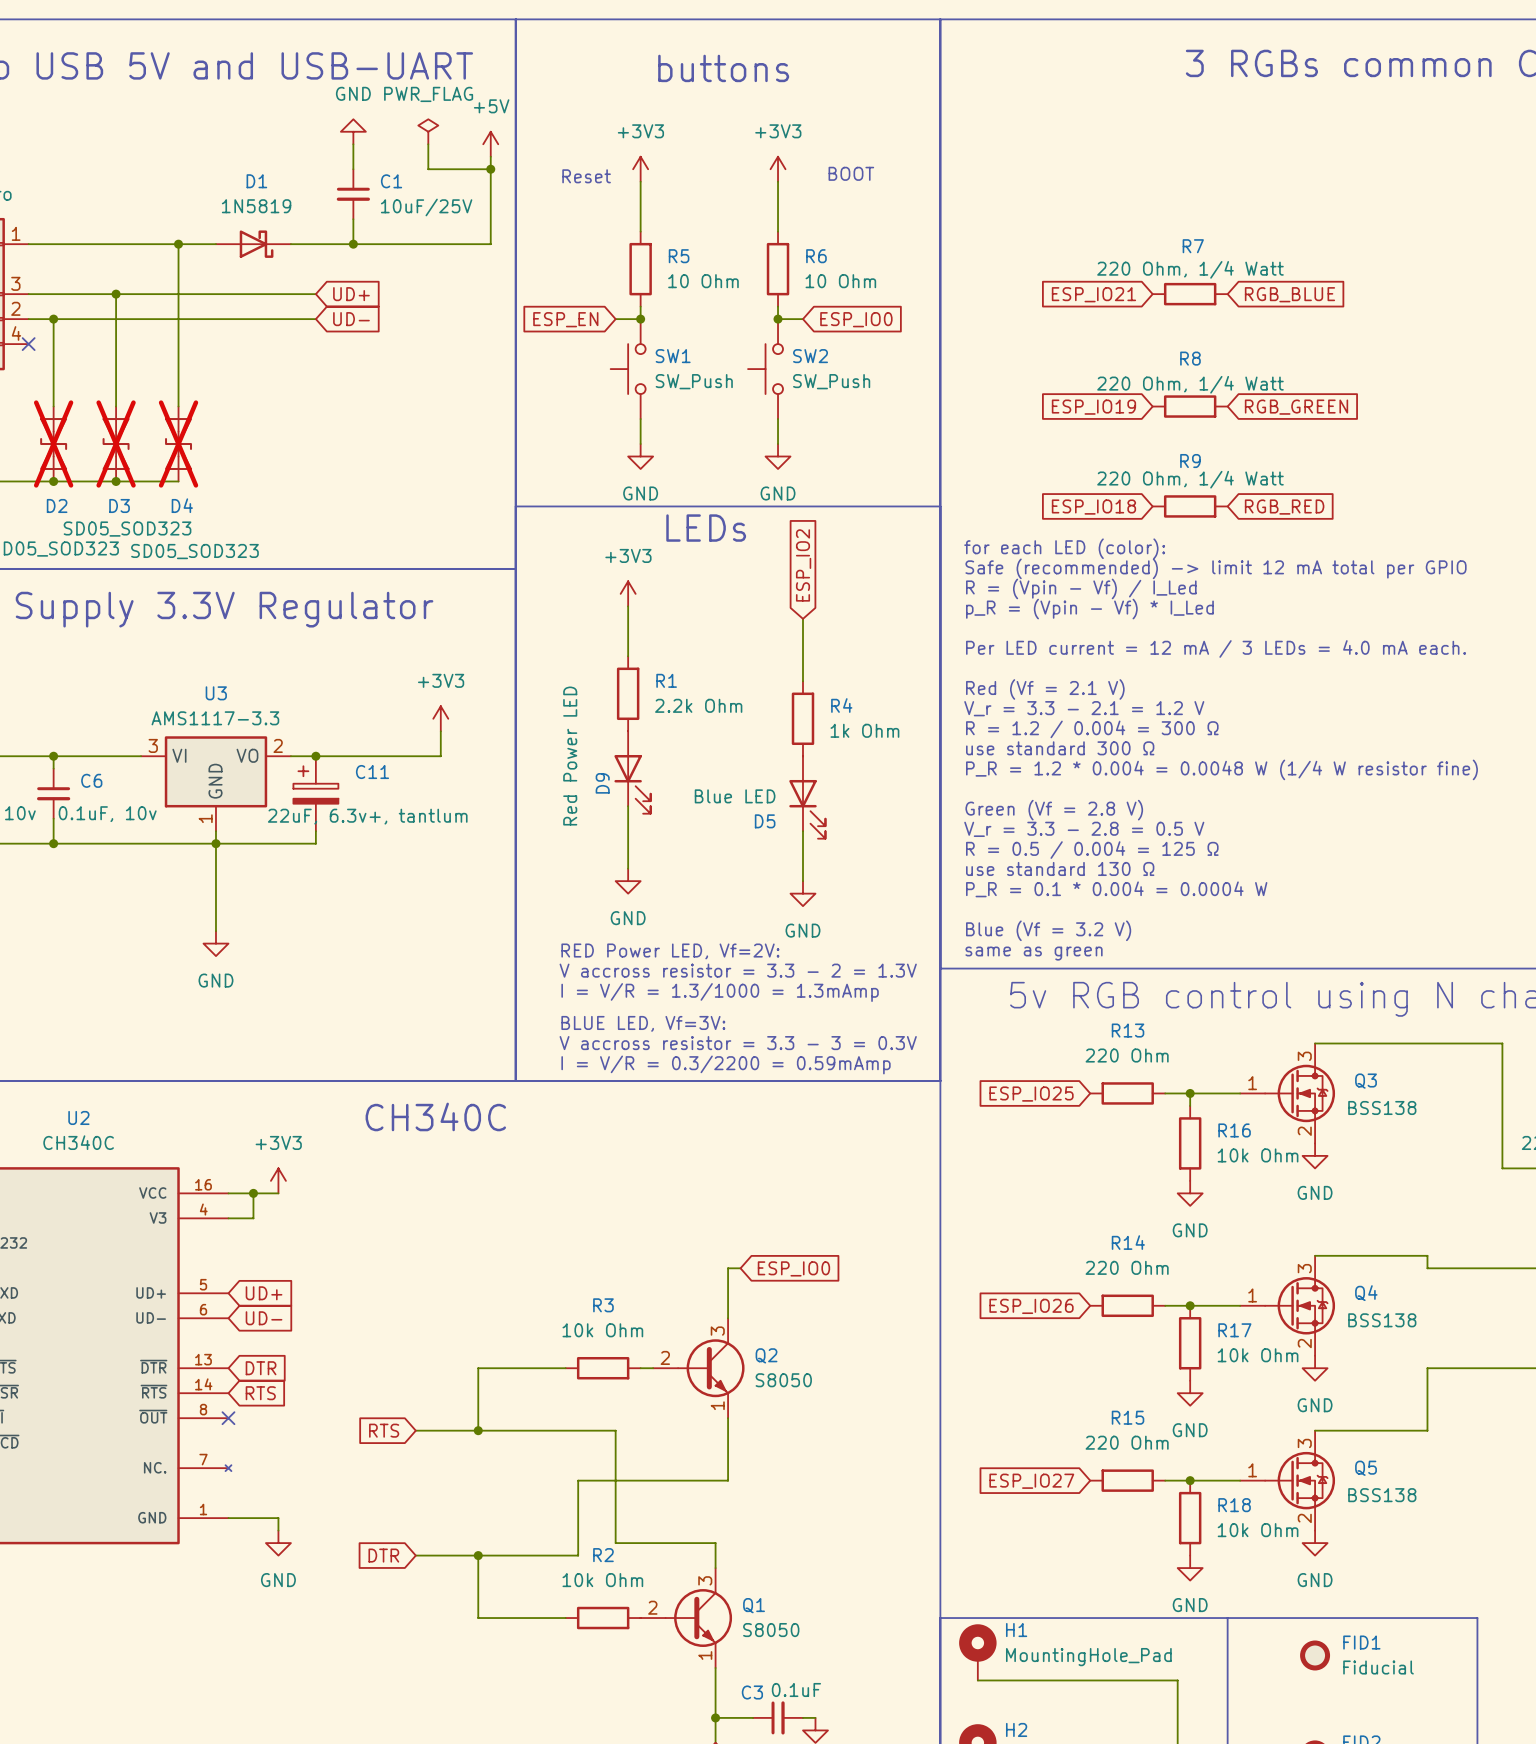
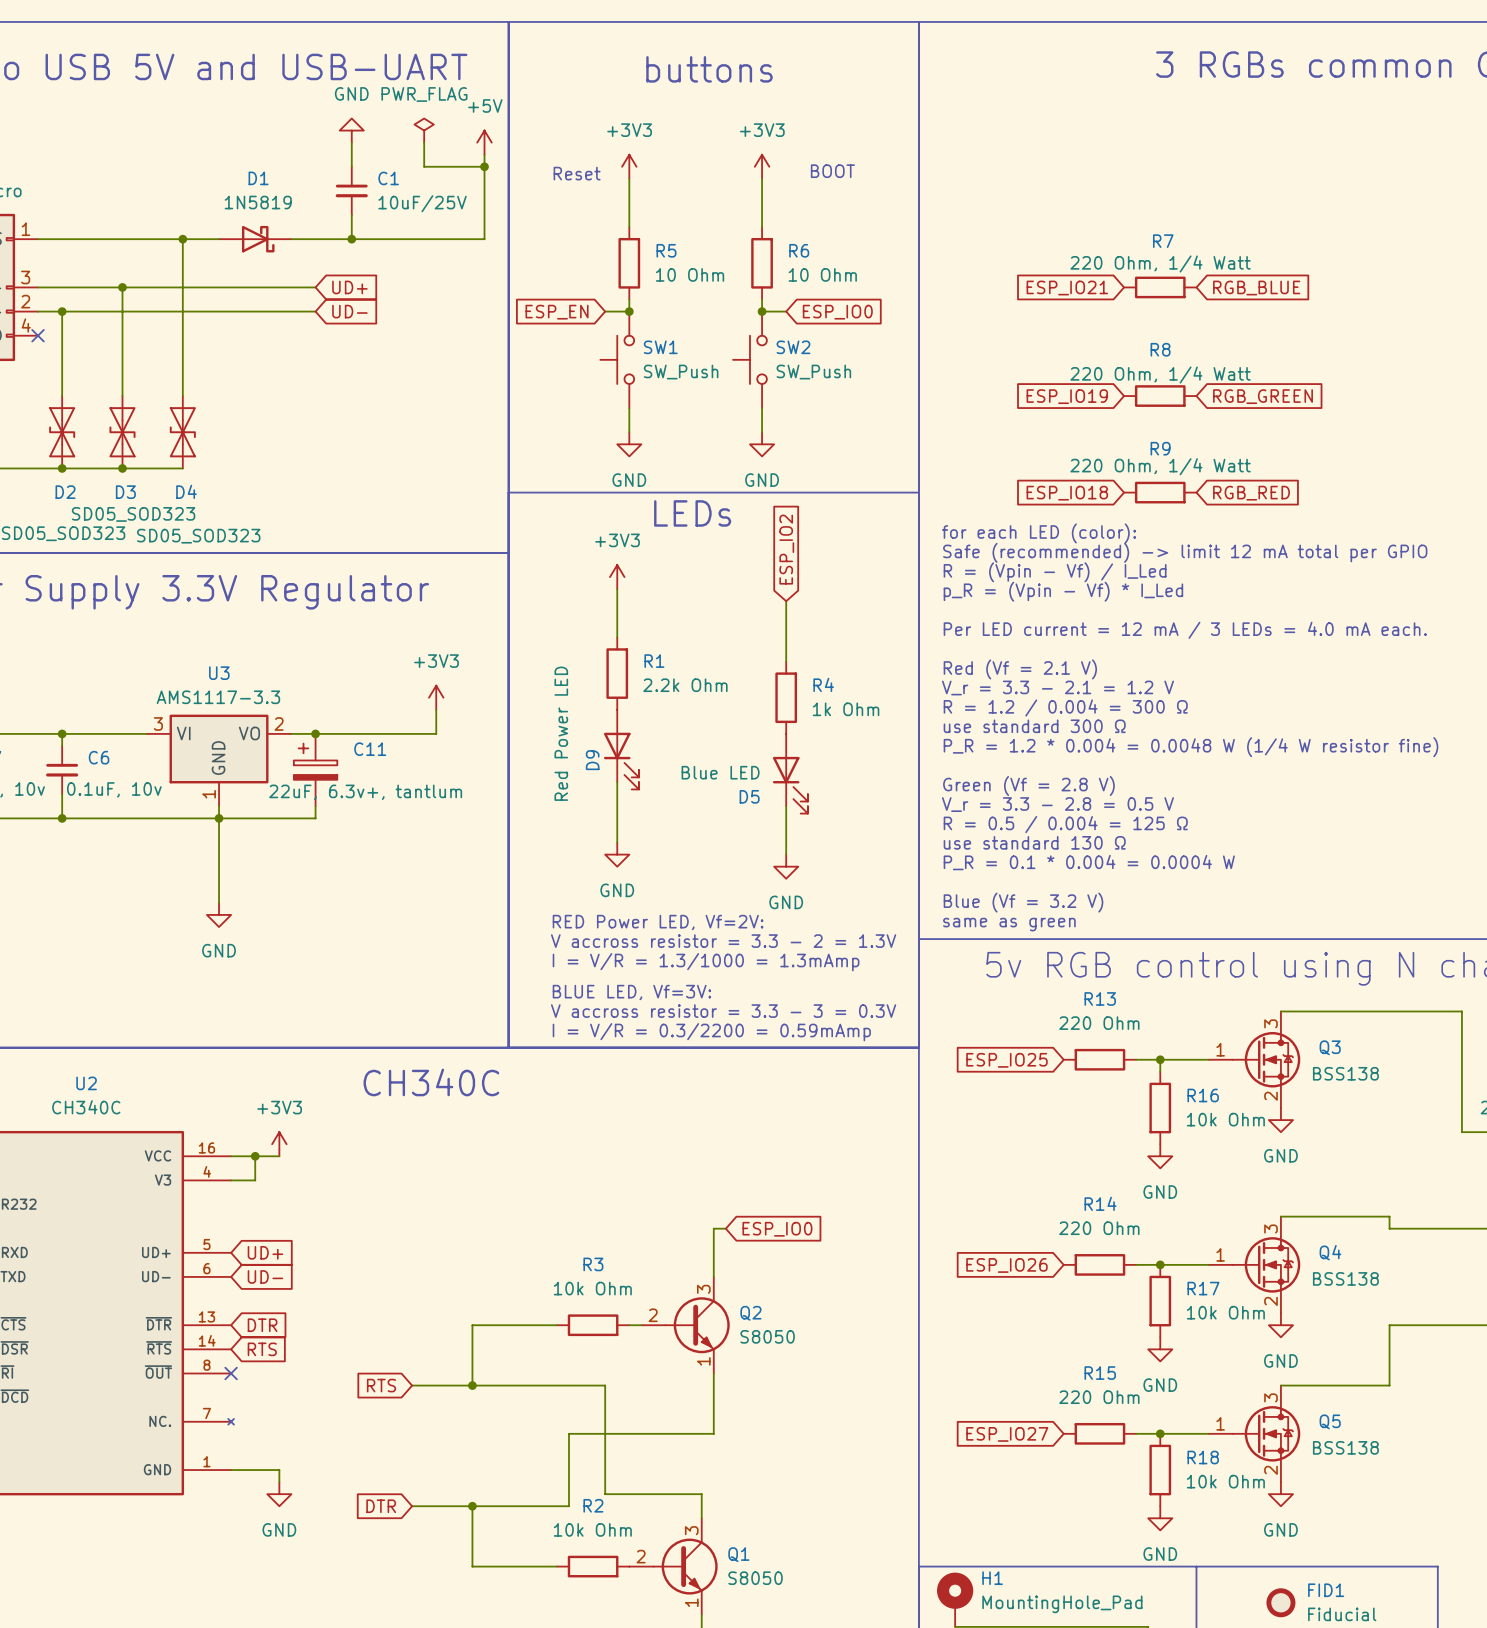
D2 do-not-place cross: (53, 444) -> none
D3 do-not-place cross: (116, 444) -> none
D4 do-not-place cross: (178, 444) -> none

